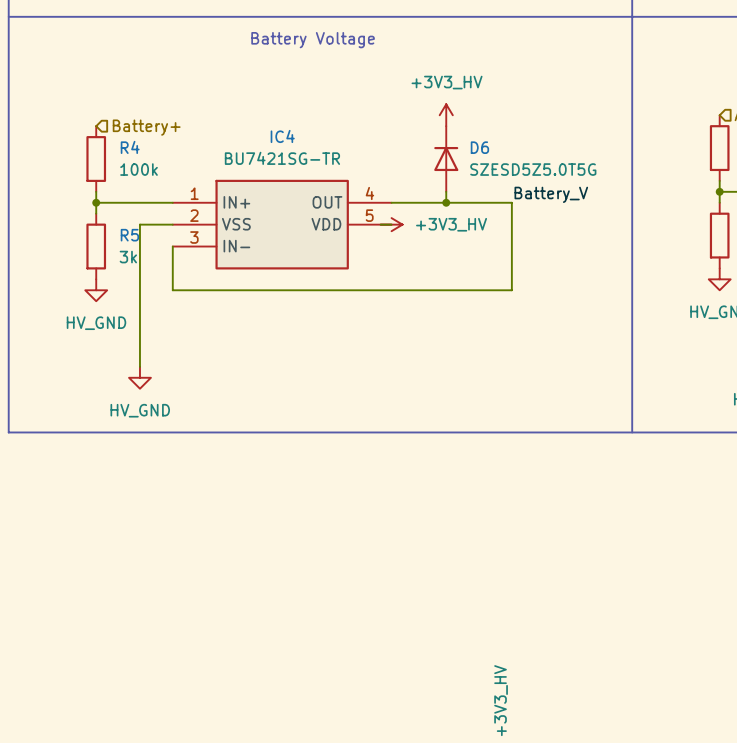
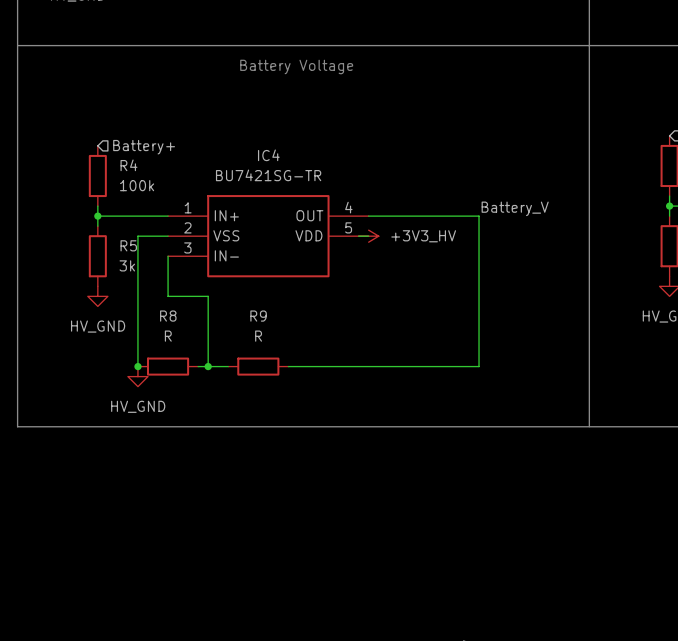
power symbol: +3V3_HV (446, 115) -> none
D6: SZESD5Z5.0T5G (446, 159) -> none
wire: (446, 191) (446, 202) -> none
junction: (446, 202) -> none
wire: (216, 290) (511, 290) -> (288, 366) (479, 366) (479, 296)
wire: none -> (208, 296) (208, 366)
junction: none -> (137, 366)
R8: none -> R (168, 366)
wire: none -> (198, 366) (228, 366)
junction: none -> (208, 366)
R9: none -> R (258, 366)

